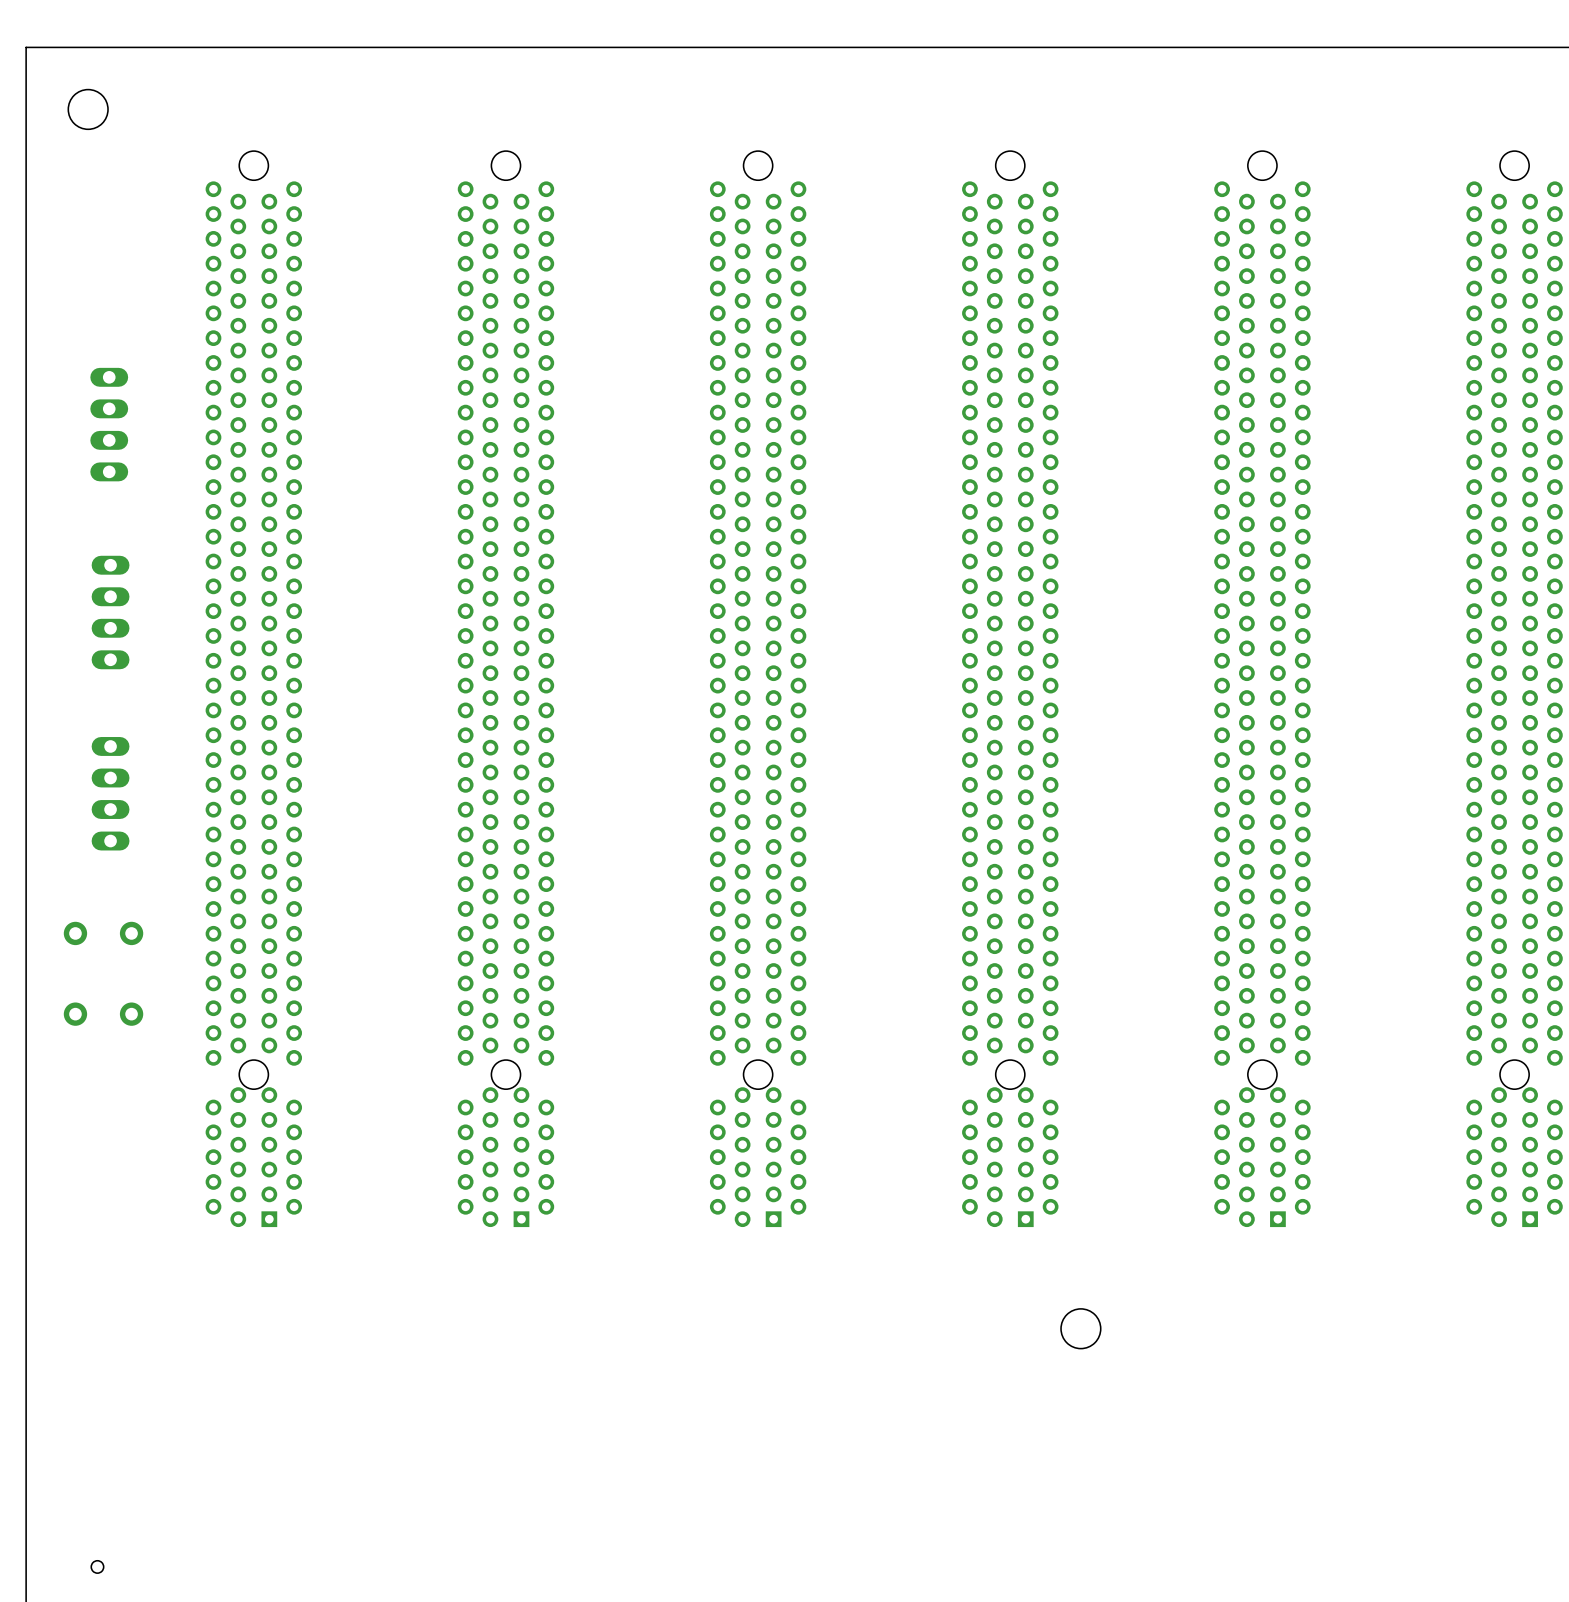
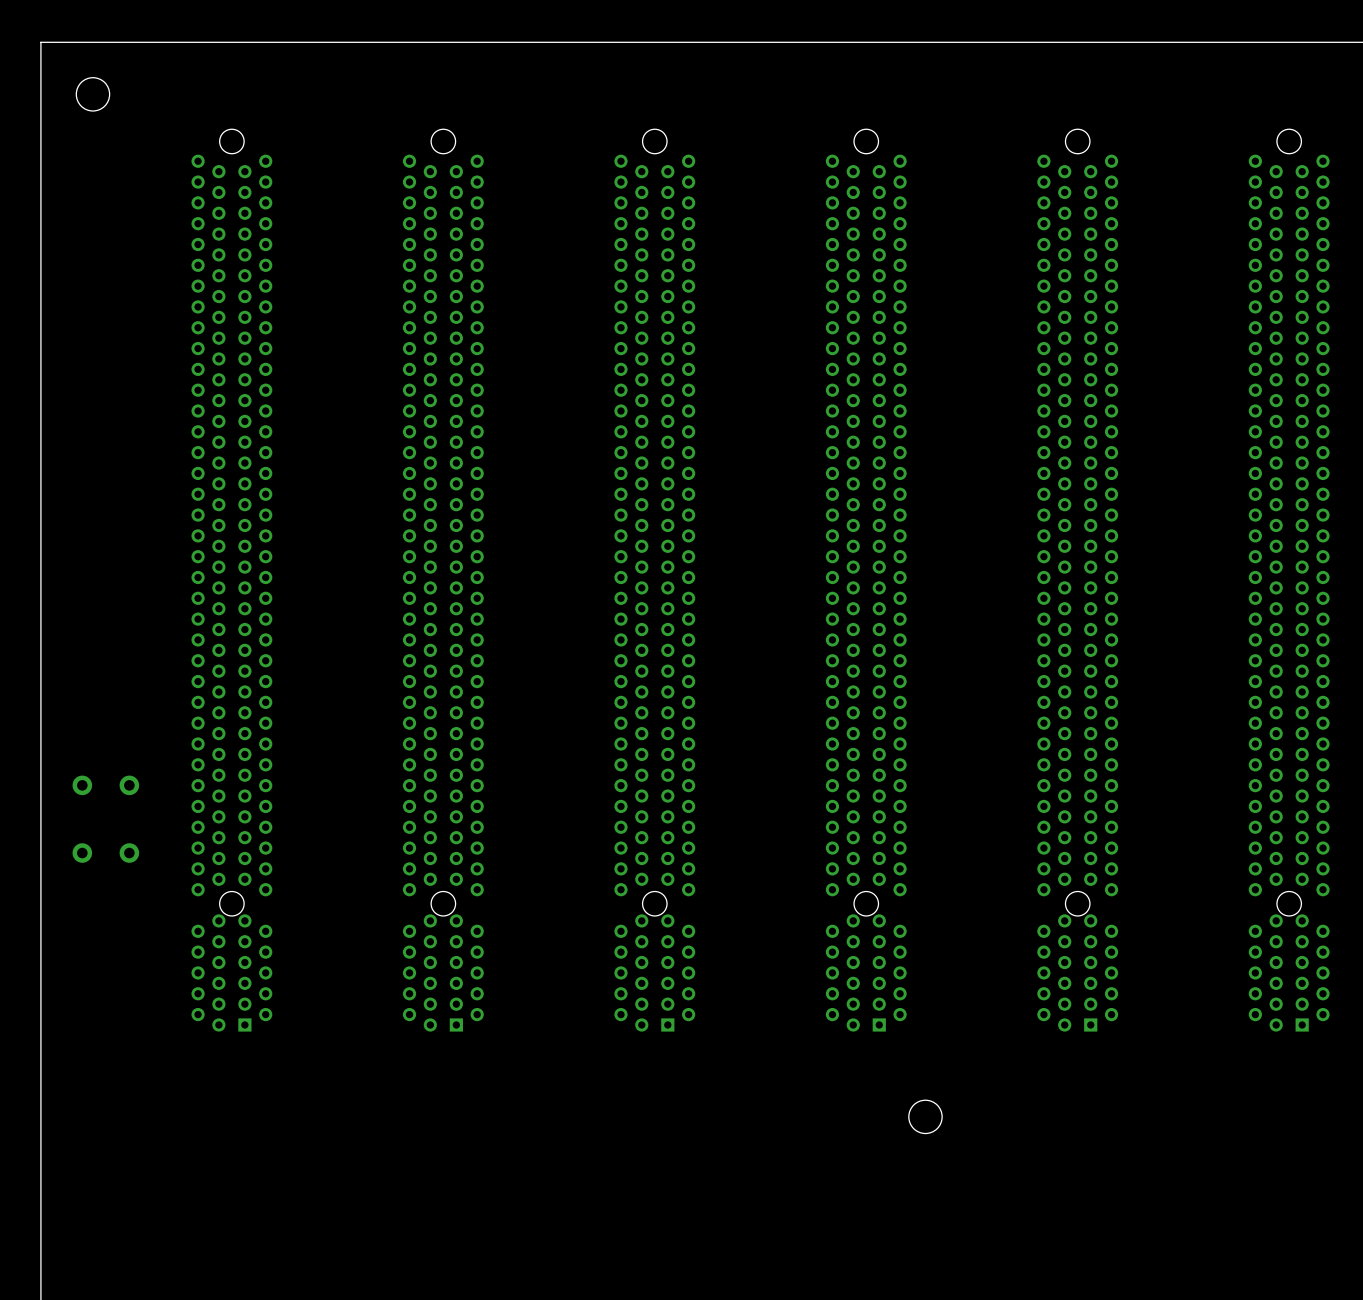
part: (109, 424) -> none
part: (110, 612) -> none
part: (110, 793) -> none

